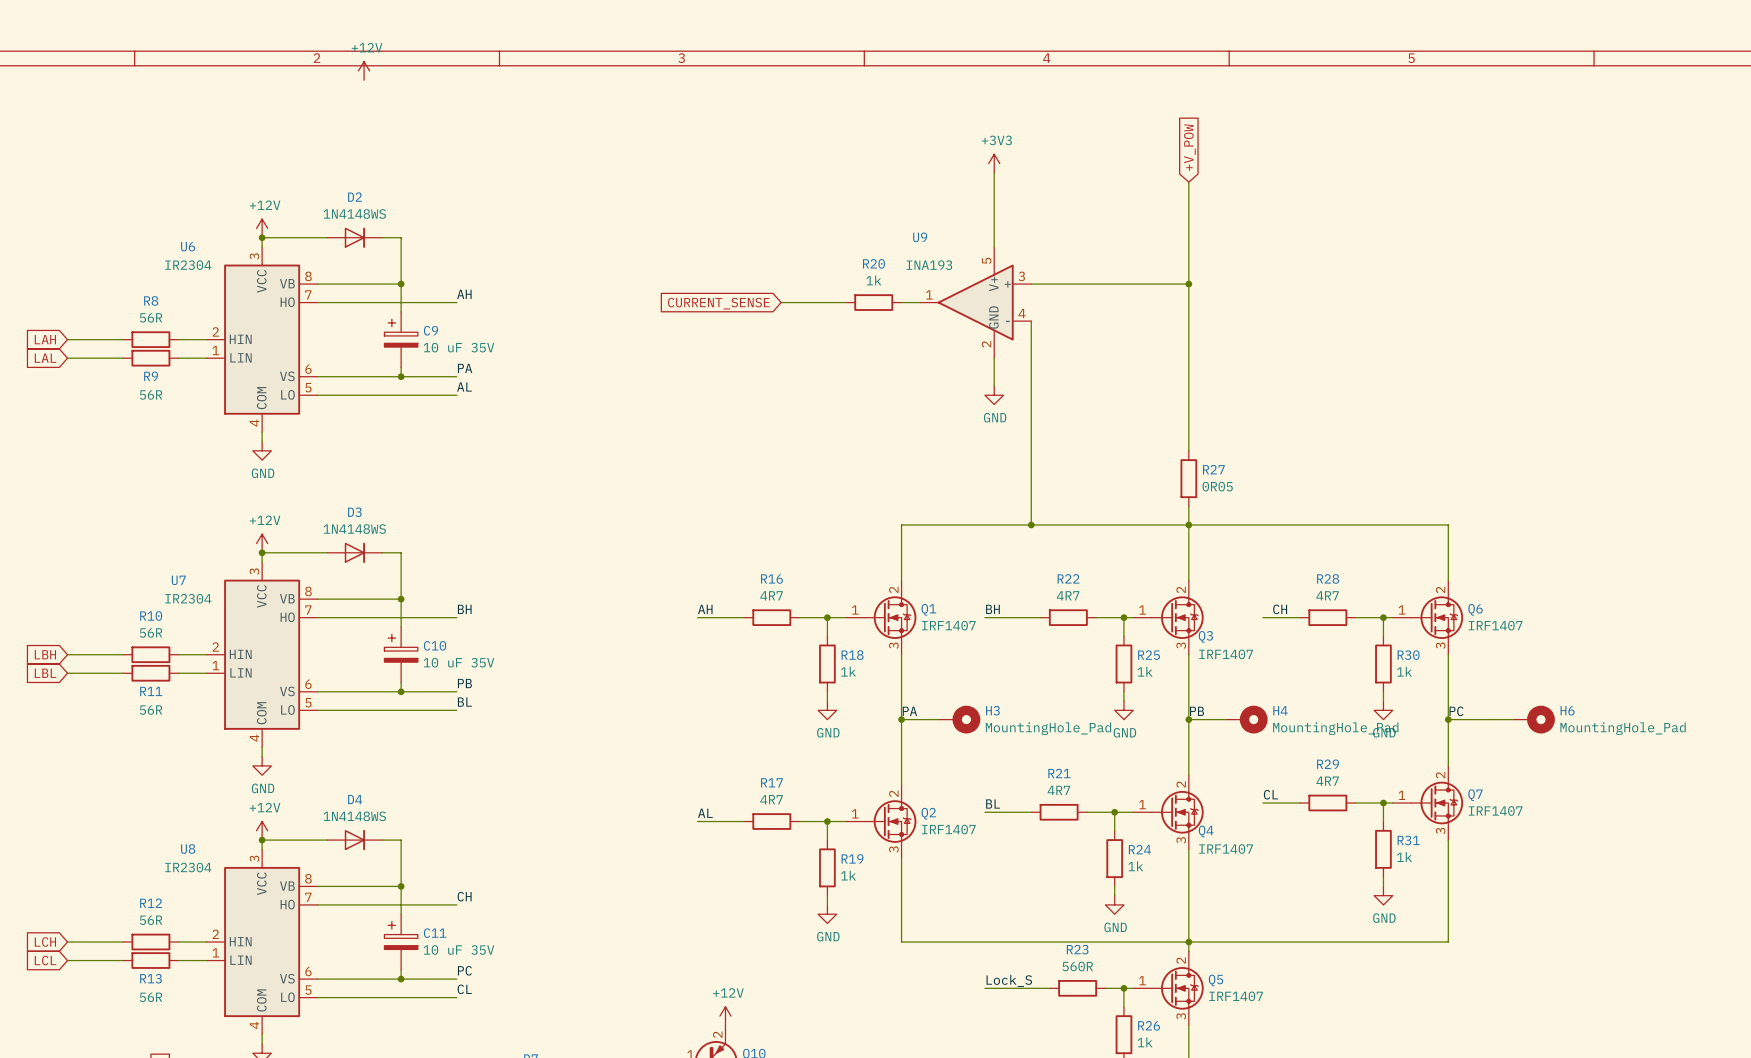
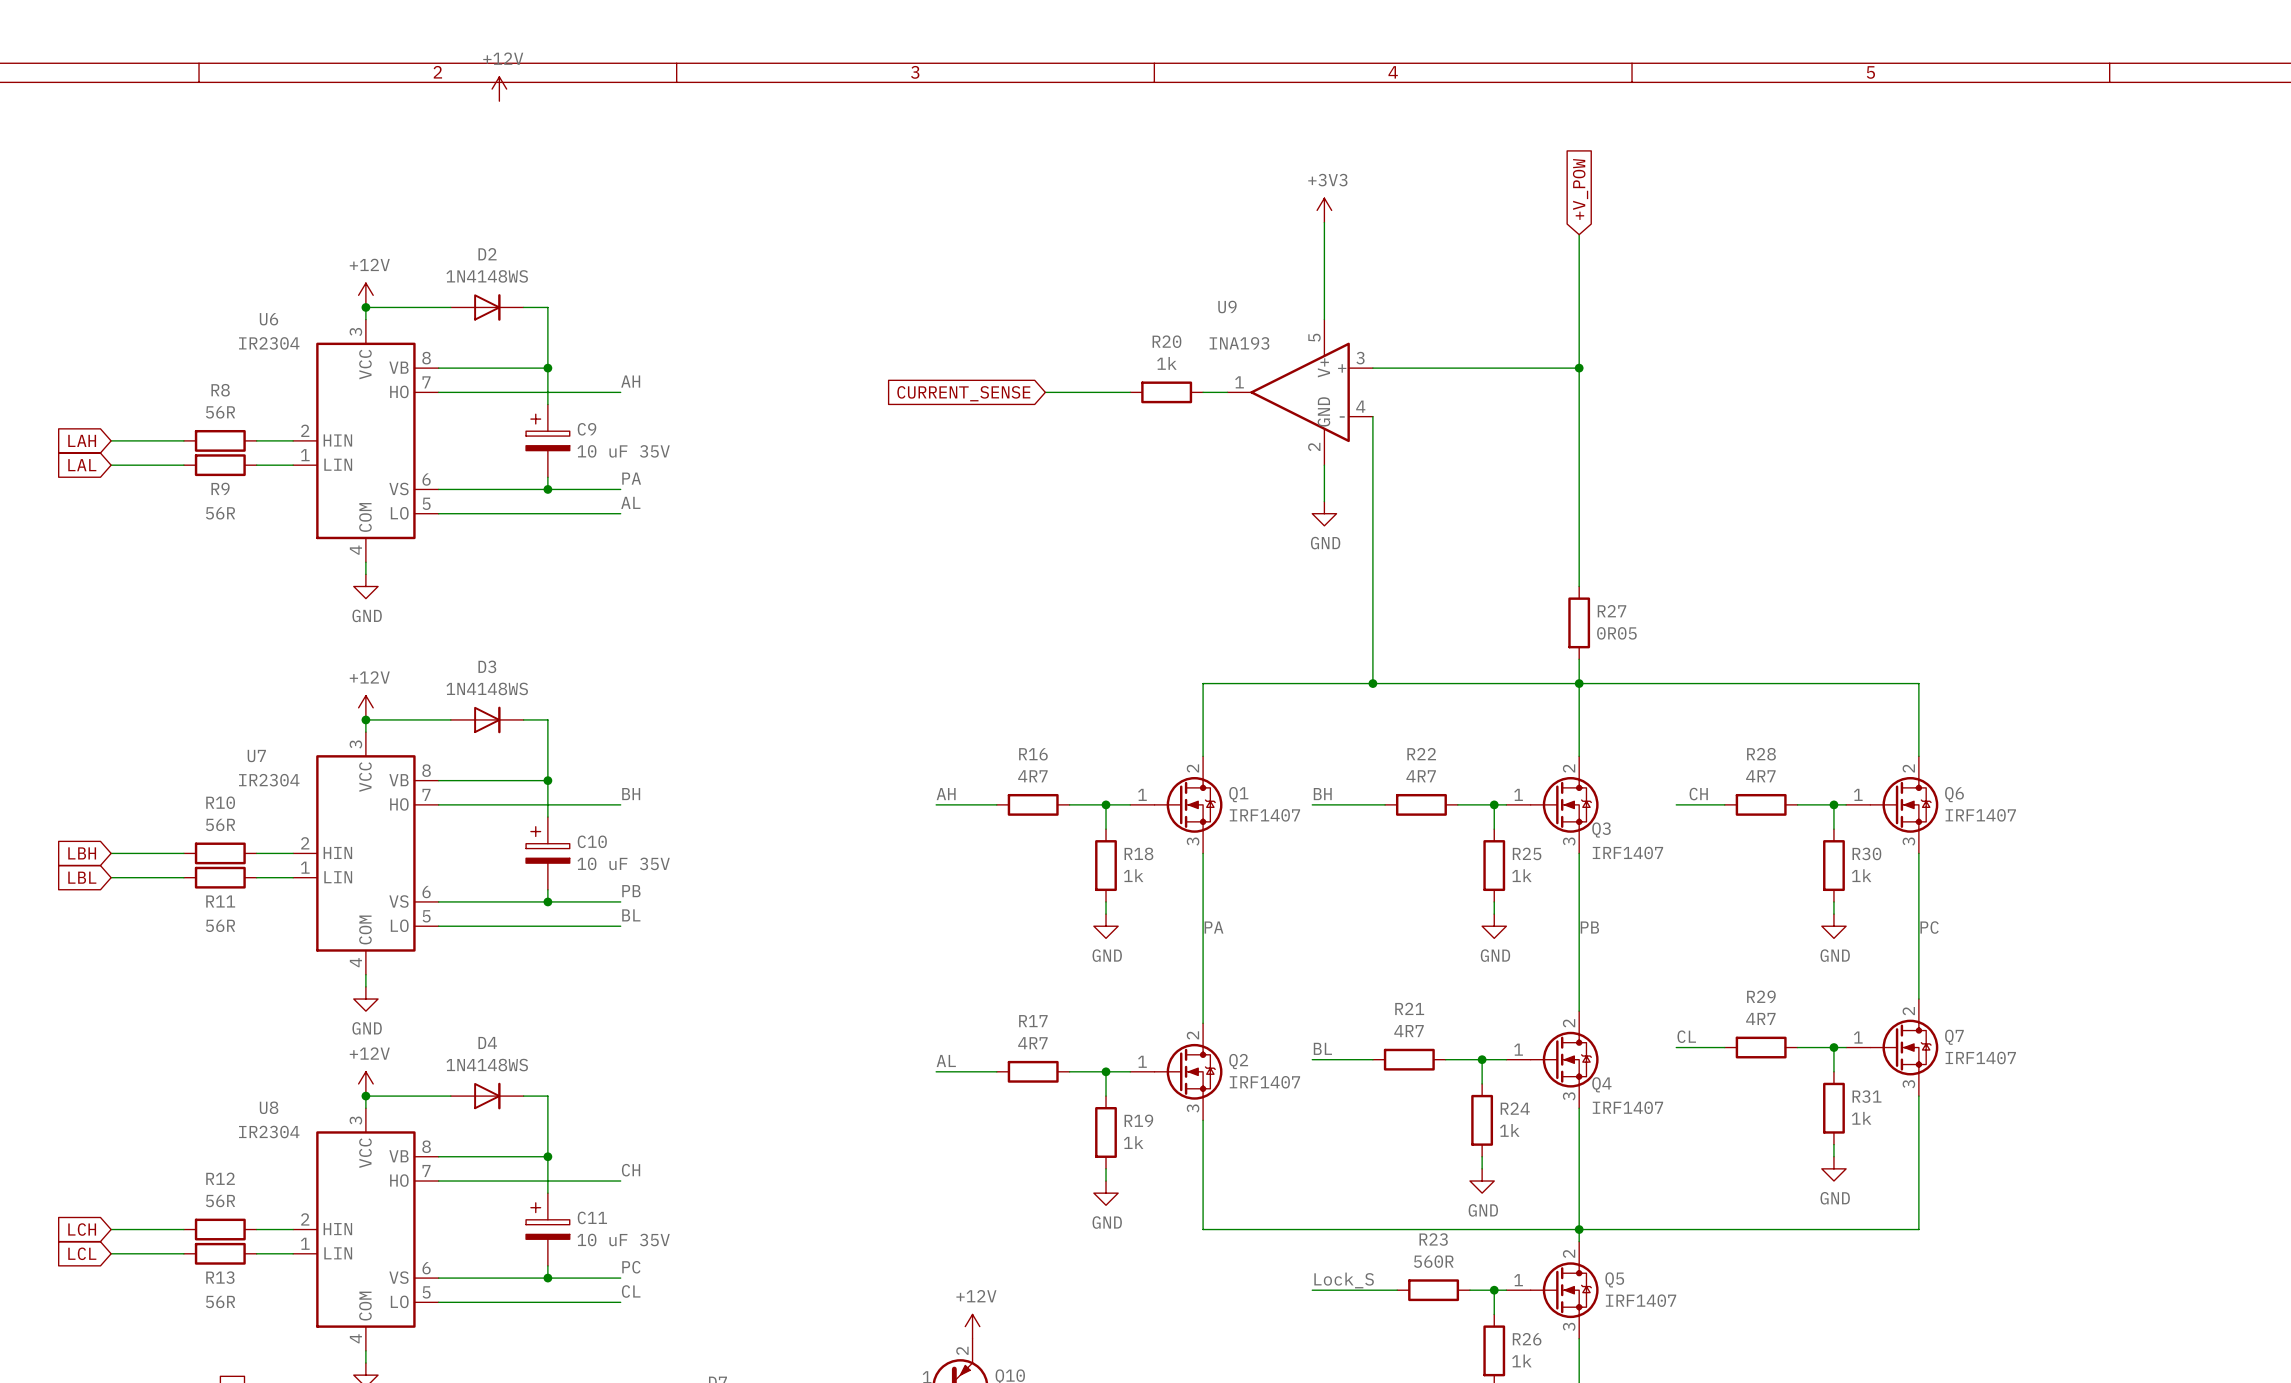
wire: (901, 719) (938, 719) -> none
junction: (901, 719) -> none
H3: MountingHole_Pad (959, 719) -> none
wire: (1188, 719) (1225, 719) -> none
junction: (1188, 719) -> none
H4: MountingHole_Pad (1246, 719) -> none
wire: (1448, 719) (1513, 719) -> none
junction: (1448, 719) -> none
H6: MountingHole_Pad (1534, 719) -> none

